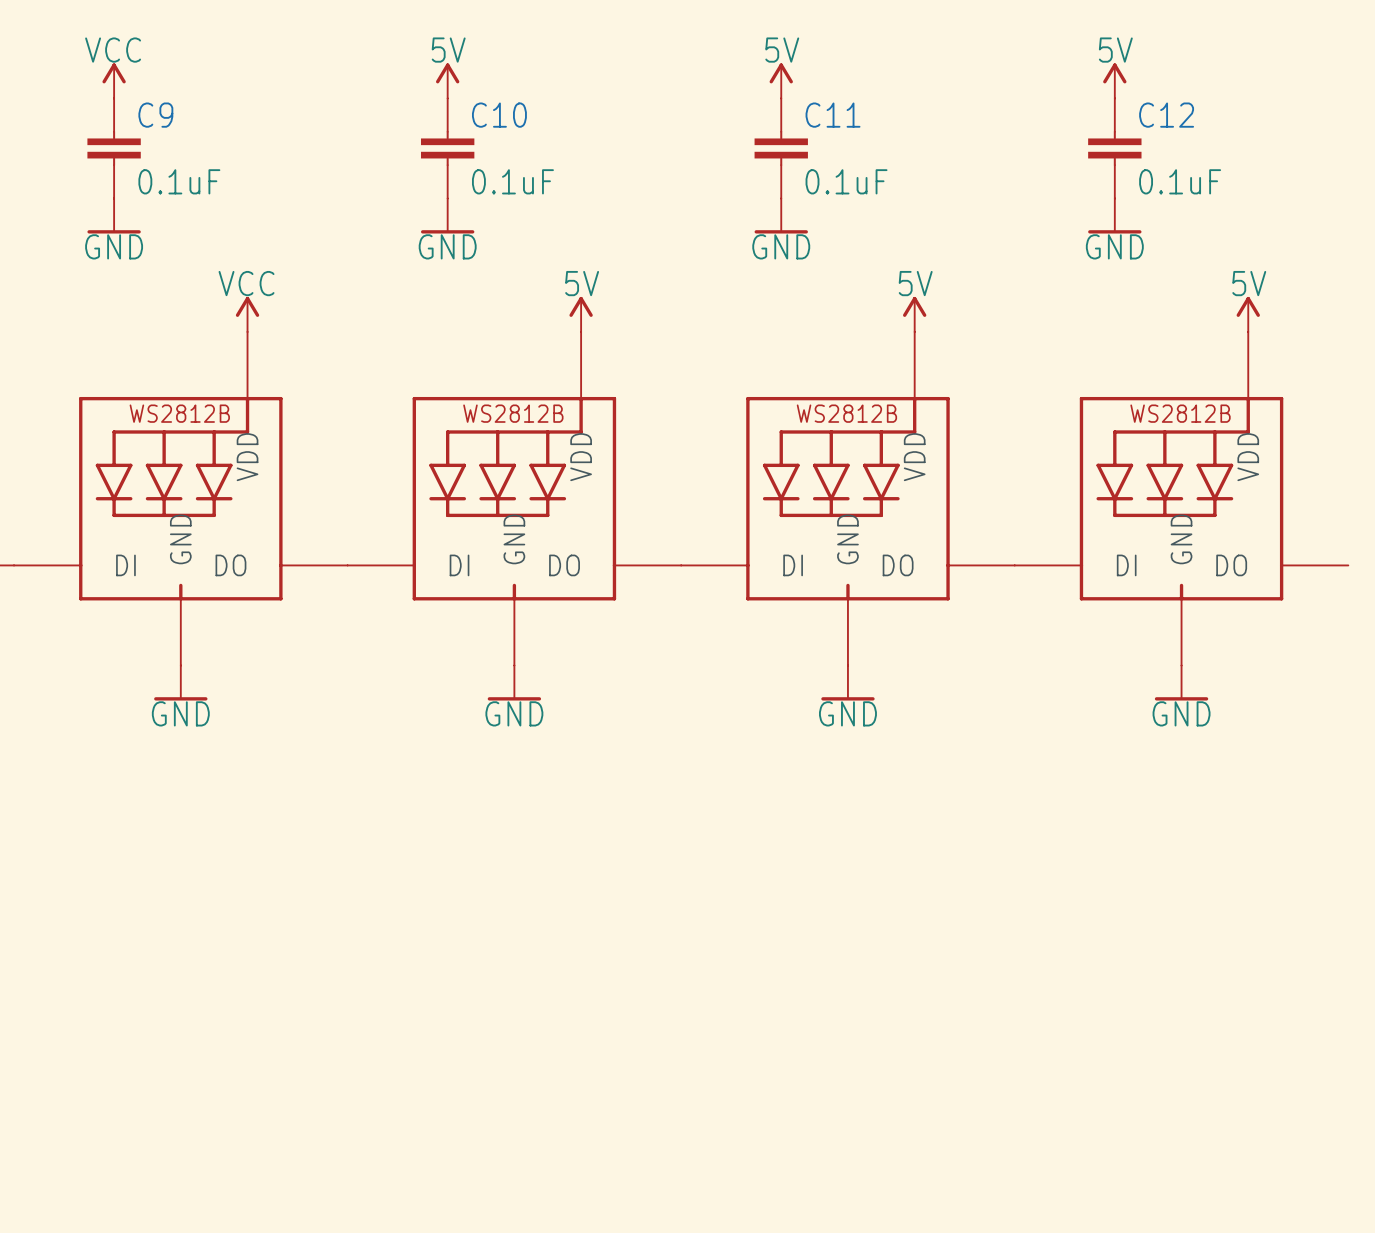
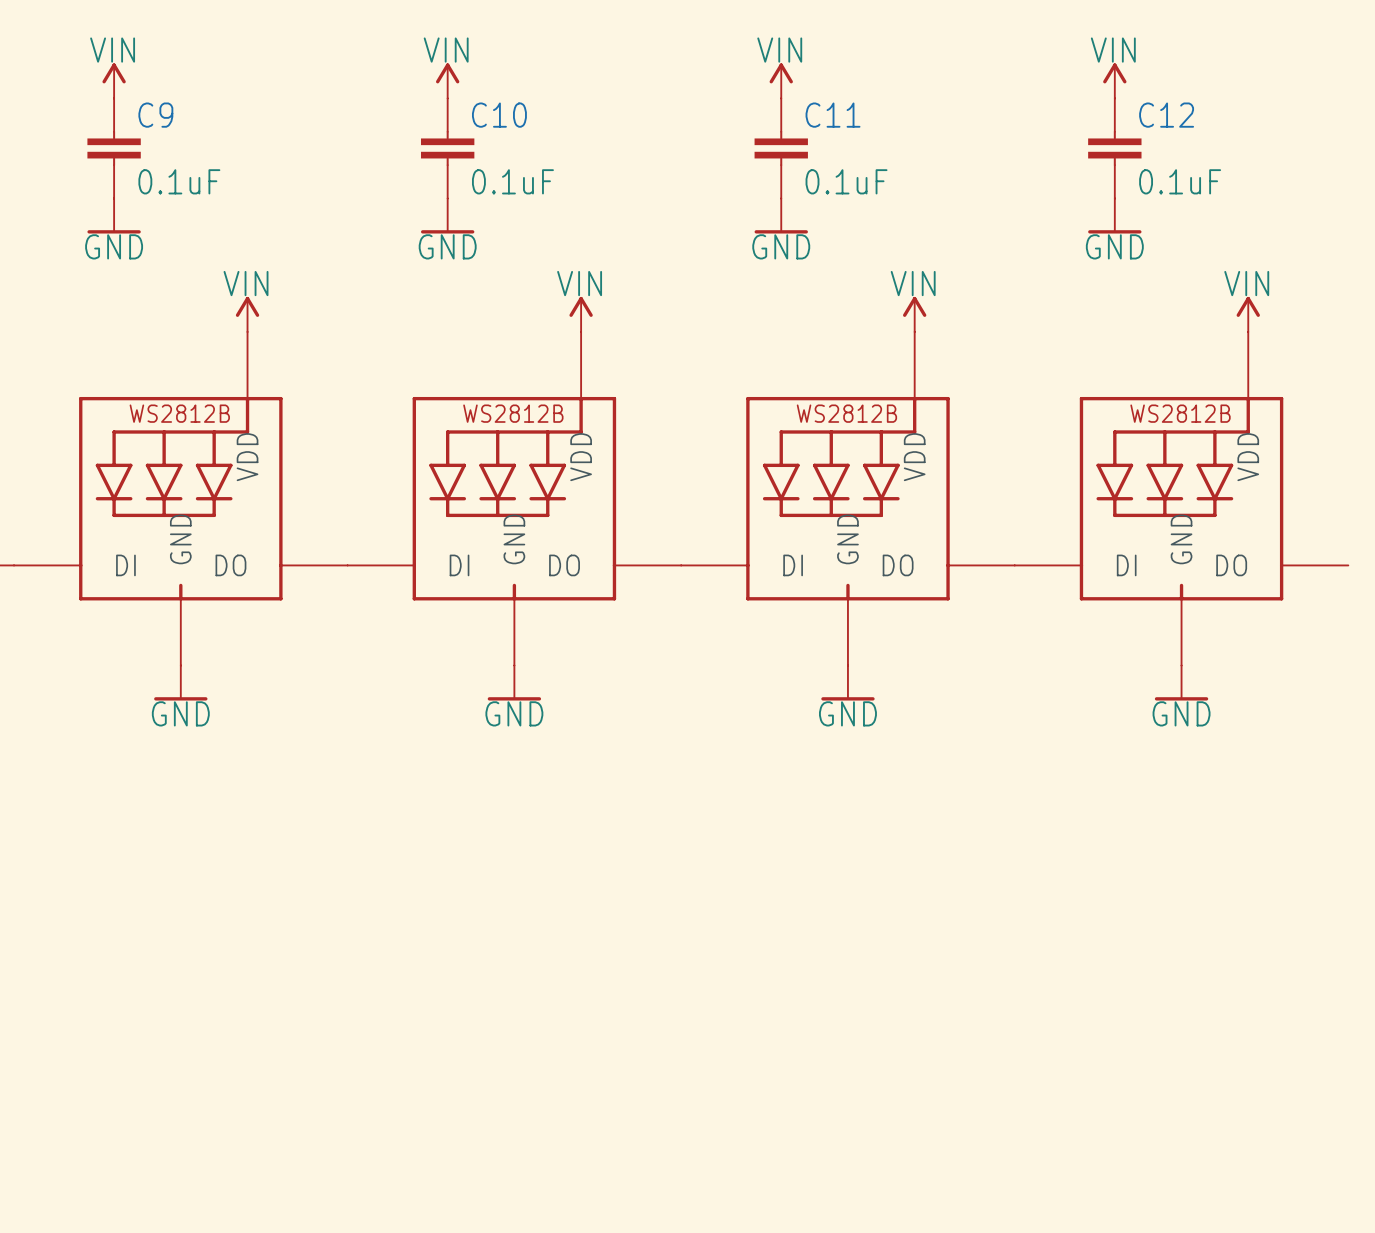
power symbol: VCC (114, 80) -> VIN (114, 80)
power symbol: 5V (447, 80) -> VIN (447, 80)
power symbol: 5V (781, 80) -> VIN (781, 80)
power symbol: 5V (1114, 80) -> VIN (1114, 80)
power symbol: VCC (247, 314) -> VIN (247, 314)
power symbol: 5V (581, 314) -> VIN (581, 314)
power symbol: 5V (914, 314) -> VIN (914, 314)
power symbol: 5V (1248, 314) -> VIN (1248, 314)

